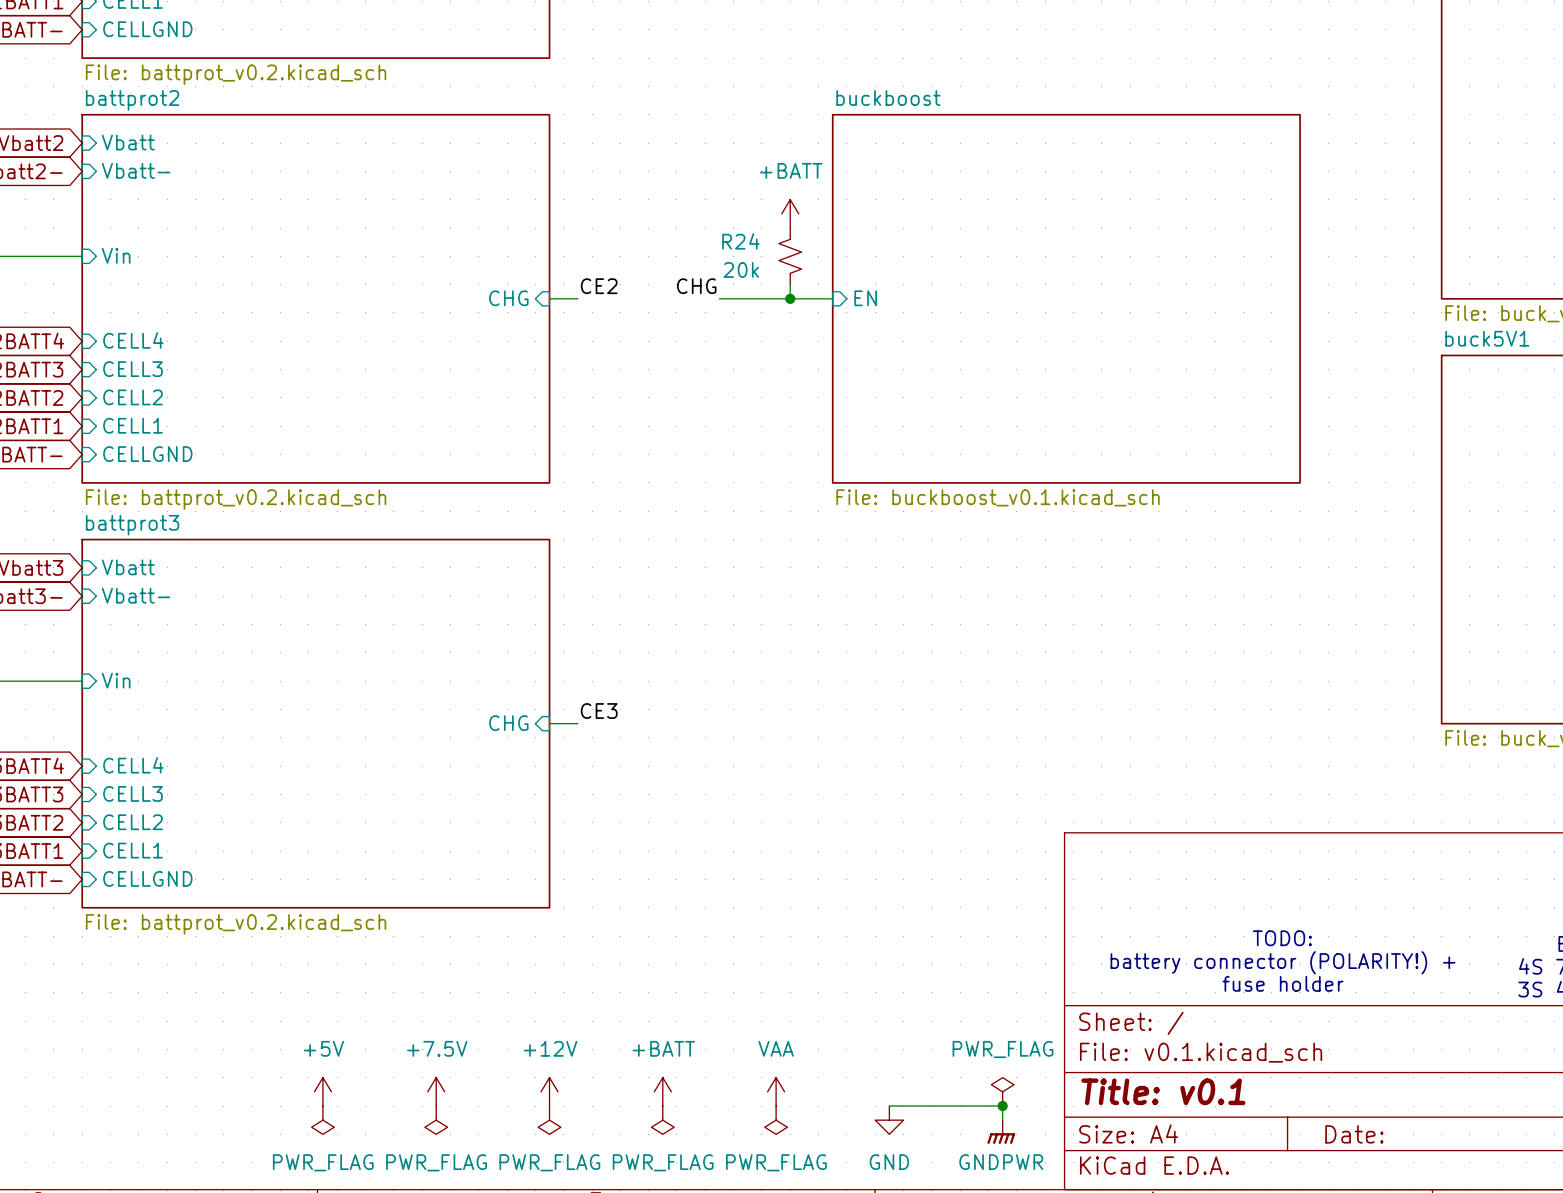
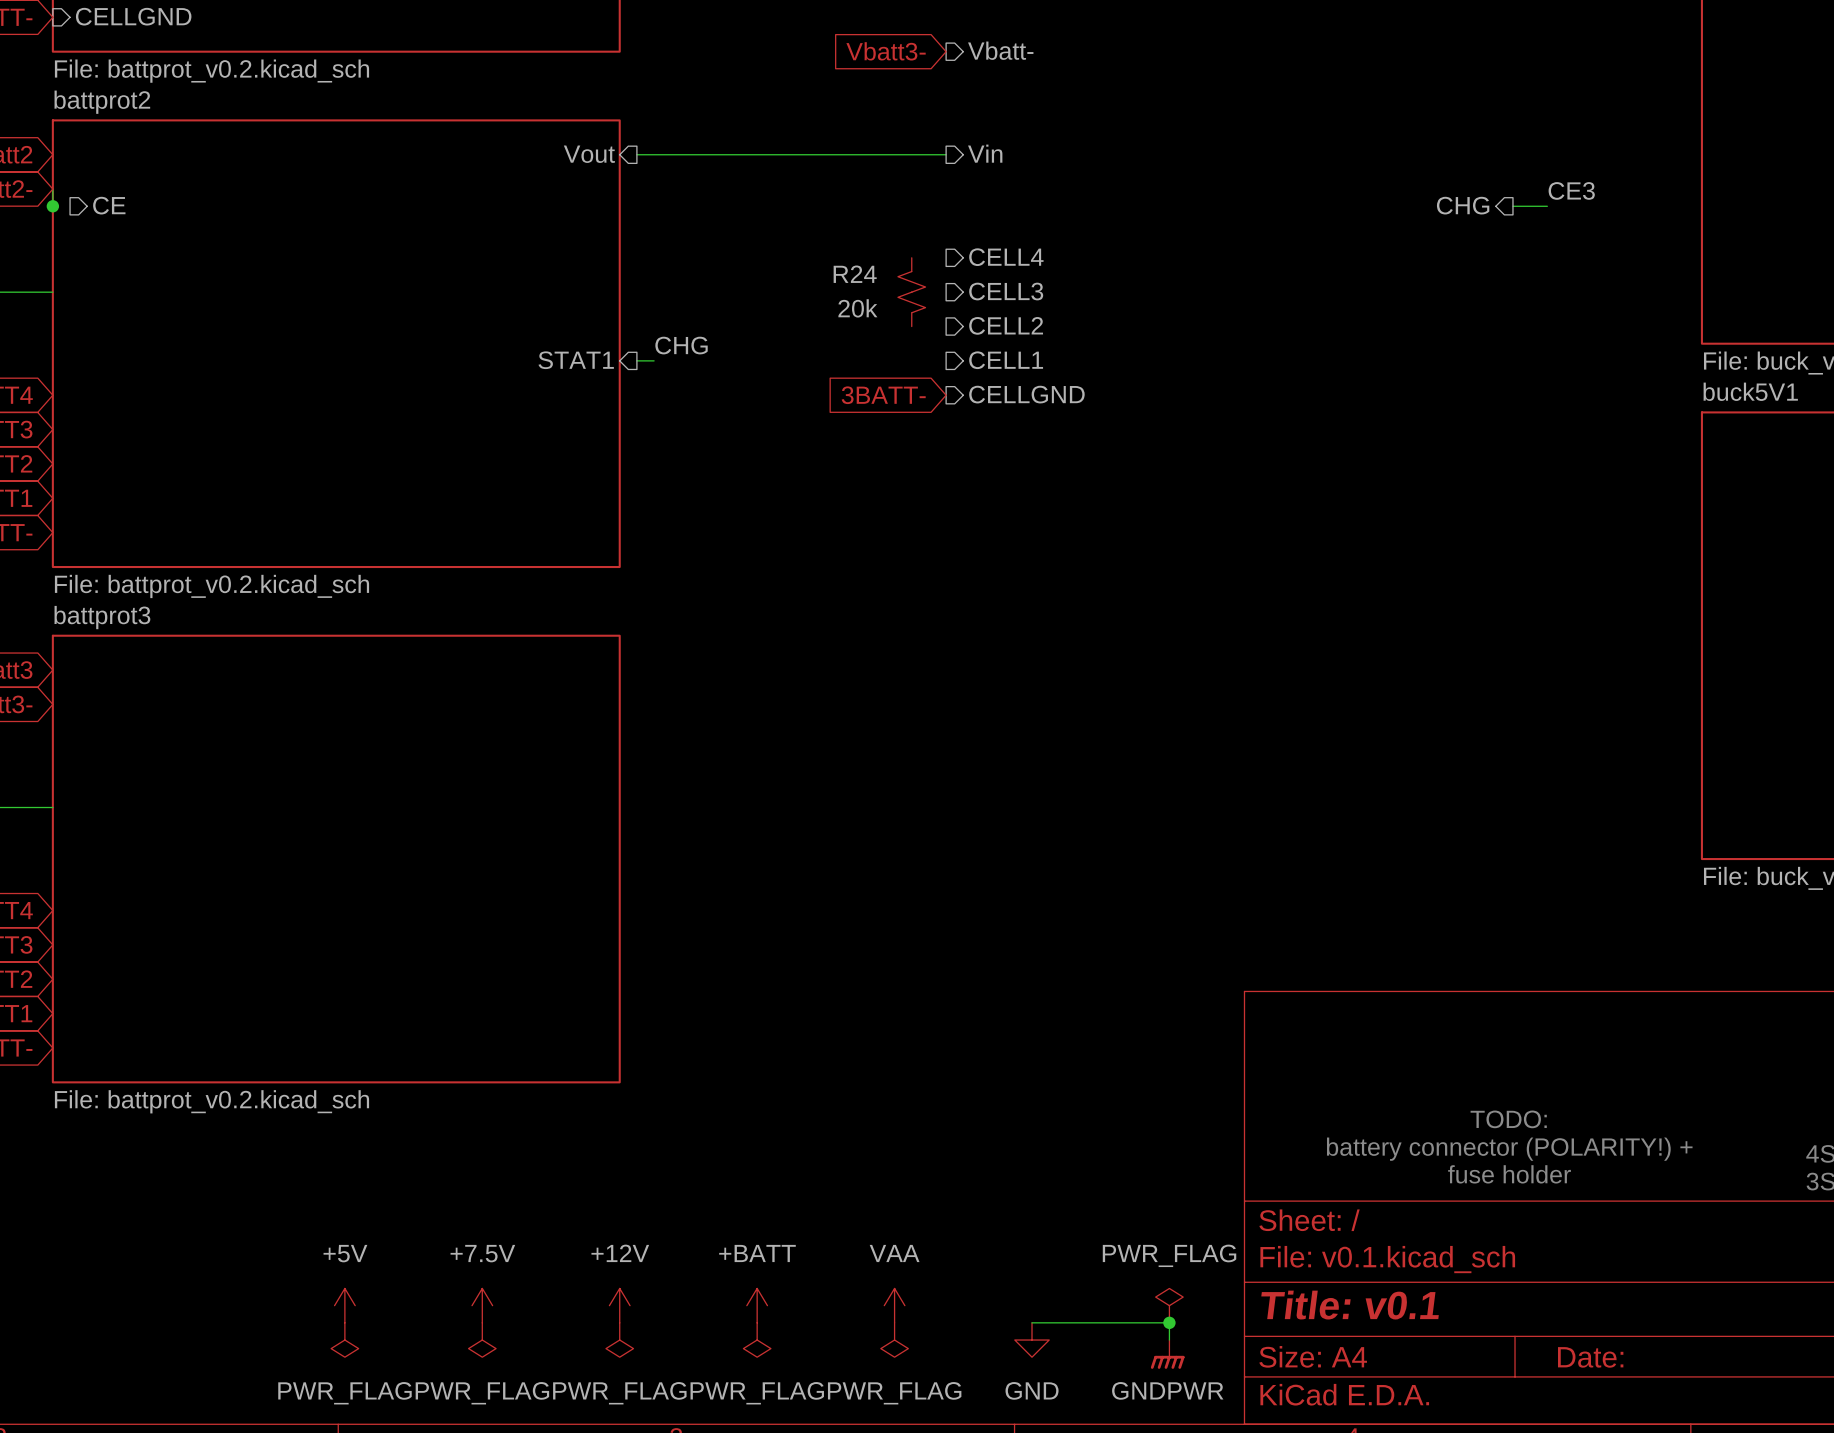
sheet pin: none -> Vbatt- (1000, 50)
global label: none -> Vbatt3- (886, 51)
sheet pin: Vbatt (128, 142) -> none
sheet pin: none -> Vout (589, 154)
sheet pin: none -> Vin (985, 153)
wire: none -> (636, 154) (946, 154)
sheet pin: Vbatt- (136, 170) -> none
label: none -> CE3 (1571, 190)
junction: none -> (52, 206)
sheet pin: none -> CE (109, 205)
sheet pin: none -> CHG (1463, 205)
wire: none -> (1512, 206) (1547, 206)
power symbol: +BATT (790, 213) -> none
sheet pin: none -> CELL4 (1006, 257)
sheet pin: Vin (116, 255) -> none
sheet pin: none -> CELL3 (1006, 291)
wire: (790, 284) (790, 298) -> none
sheet pin: none -> CELL2 (1006, 325)
label: CE2 (599, 286) -> none
label position: CHG (696, 286) -> CHG (681, 345)
sheet pin: CHG (508, 298) -> none
wire: (549, 298) (577, 298) -> none
wire: (719, 298) (832, 298) -> none
junction: (790, 298) -> none
sheet pin: EN (865, 298) -> none
sheet buckboost: File: buckboost_v0.1.kicad_sch (1066, 298) -> none
sheet pin: none -> STAT1 (576, 360)
wire: none -> (636, 360) (654, 360)
sheet pin: none -> CELL1 (1006, 360)
sheet pin: CELL4 (133, 340) -> none
sheet pin: none -> CELLGND (1026, 394)
global label: none -> 3BATT- (883, 395)
sheet pin: CELL3 (133, 369) -> none
sheet pin: CELL2 (133, 397) -> none
sheet pin: CELL1 (133, 425) -> none
sheet pin: CELLGND (147, 454) -> none
sheet pin: Vbatt (128, 567) -> none
sheet pin: Vbatt- (136, 595) -> none
sheet pin: Vin (116, 680) -> none
label: CE3 (599, 711) -> none
sheet pin: CHG (508, 723) -> none
wire: (549, 723) (577, 723) -> none
sheet pin: CELL4 (133, 765) -> none
sheet pin: CELL3 (133, 793) -> none
sheet pin: CELL2 (133, 822) -> none
sheet pin: CELL1 (133, 850) -> none
sheet pin: CELLGND (147, 878) -> none

